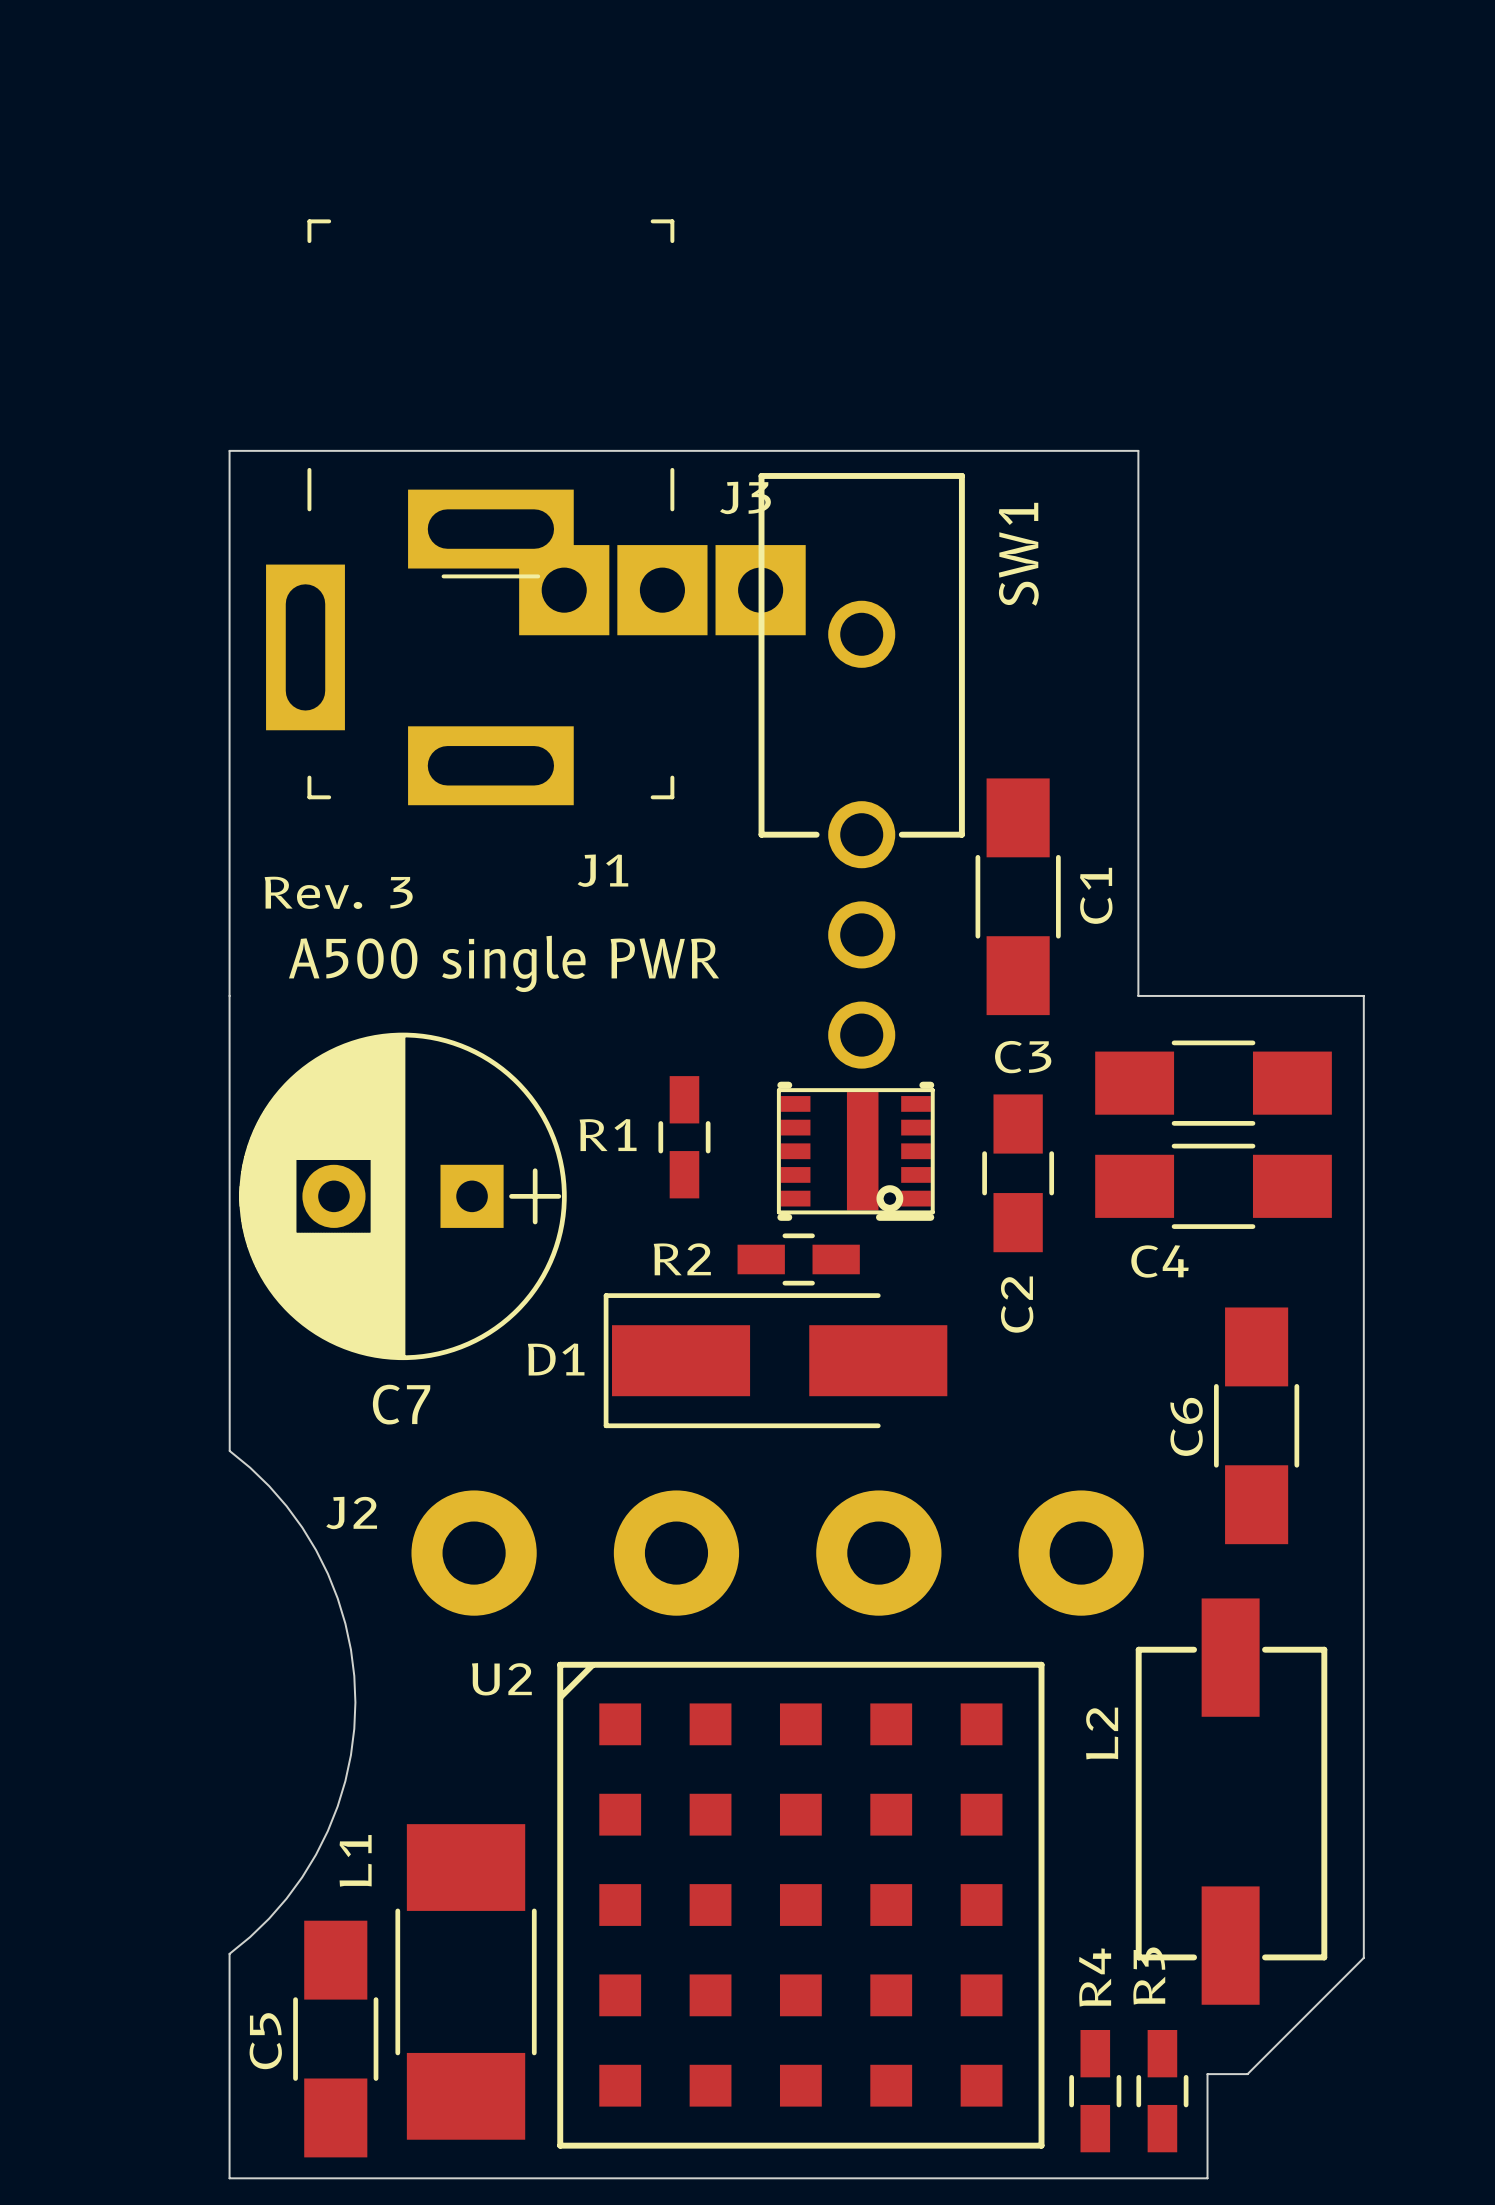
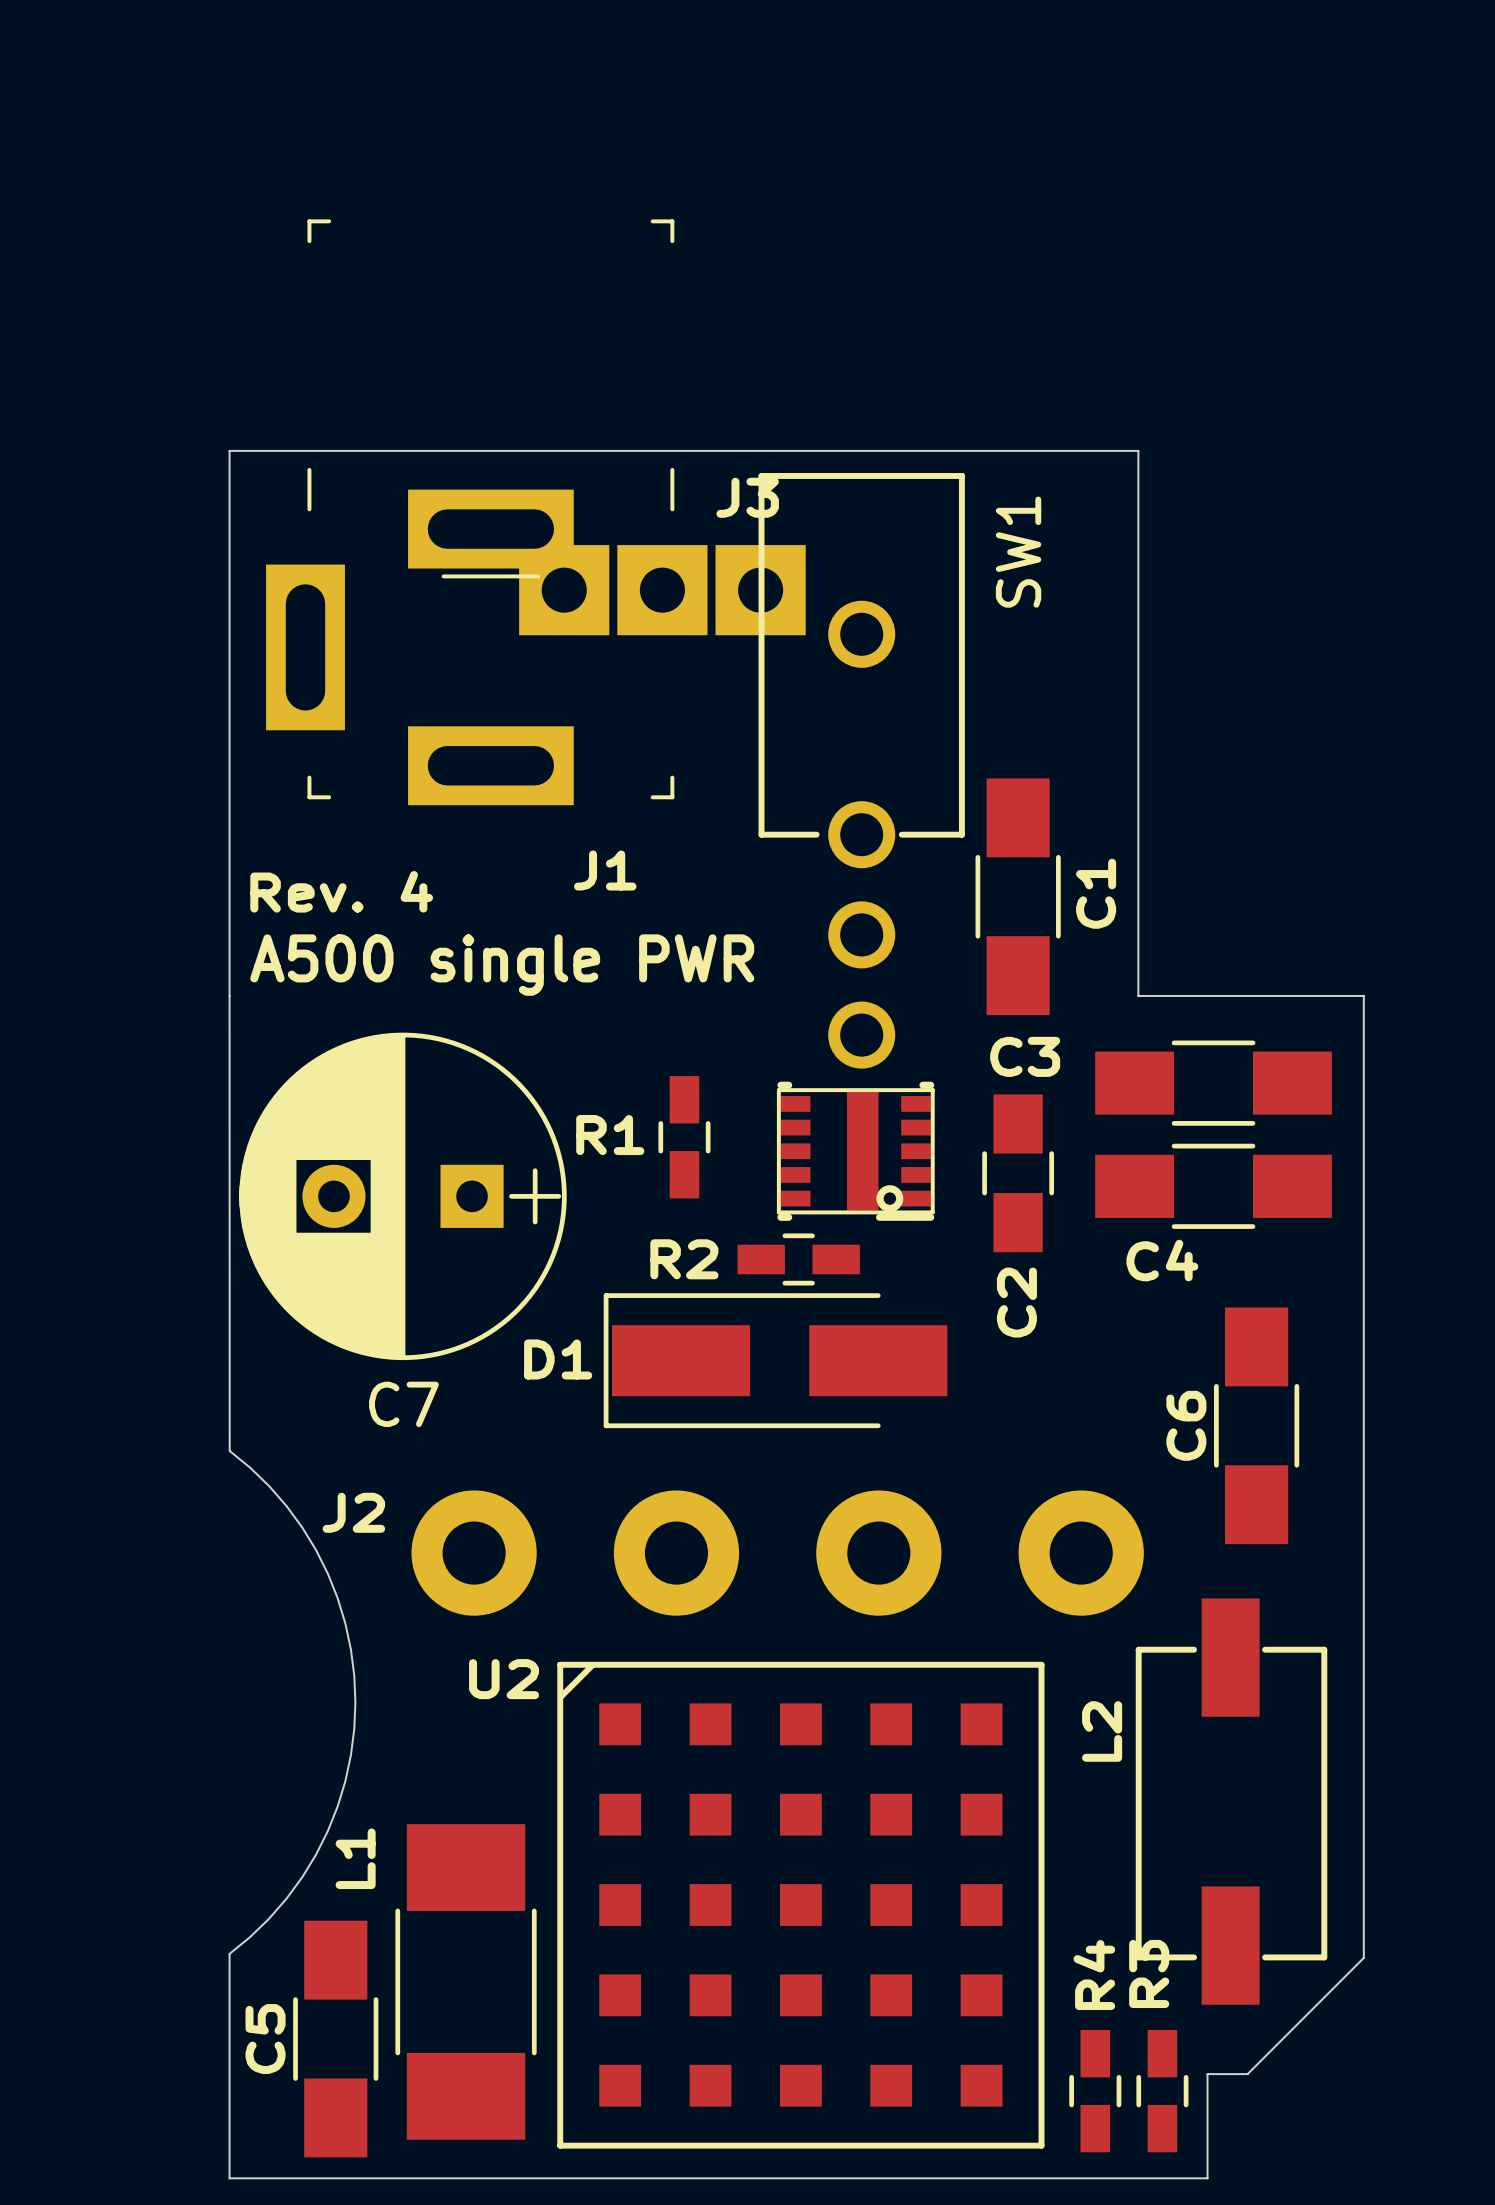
text: Rev. 3 (338, 892) -> Rev. 4 (341, 891)

